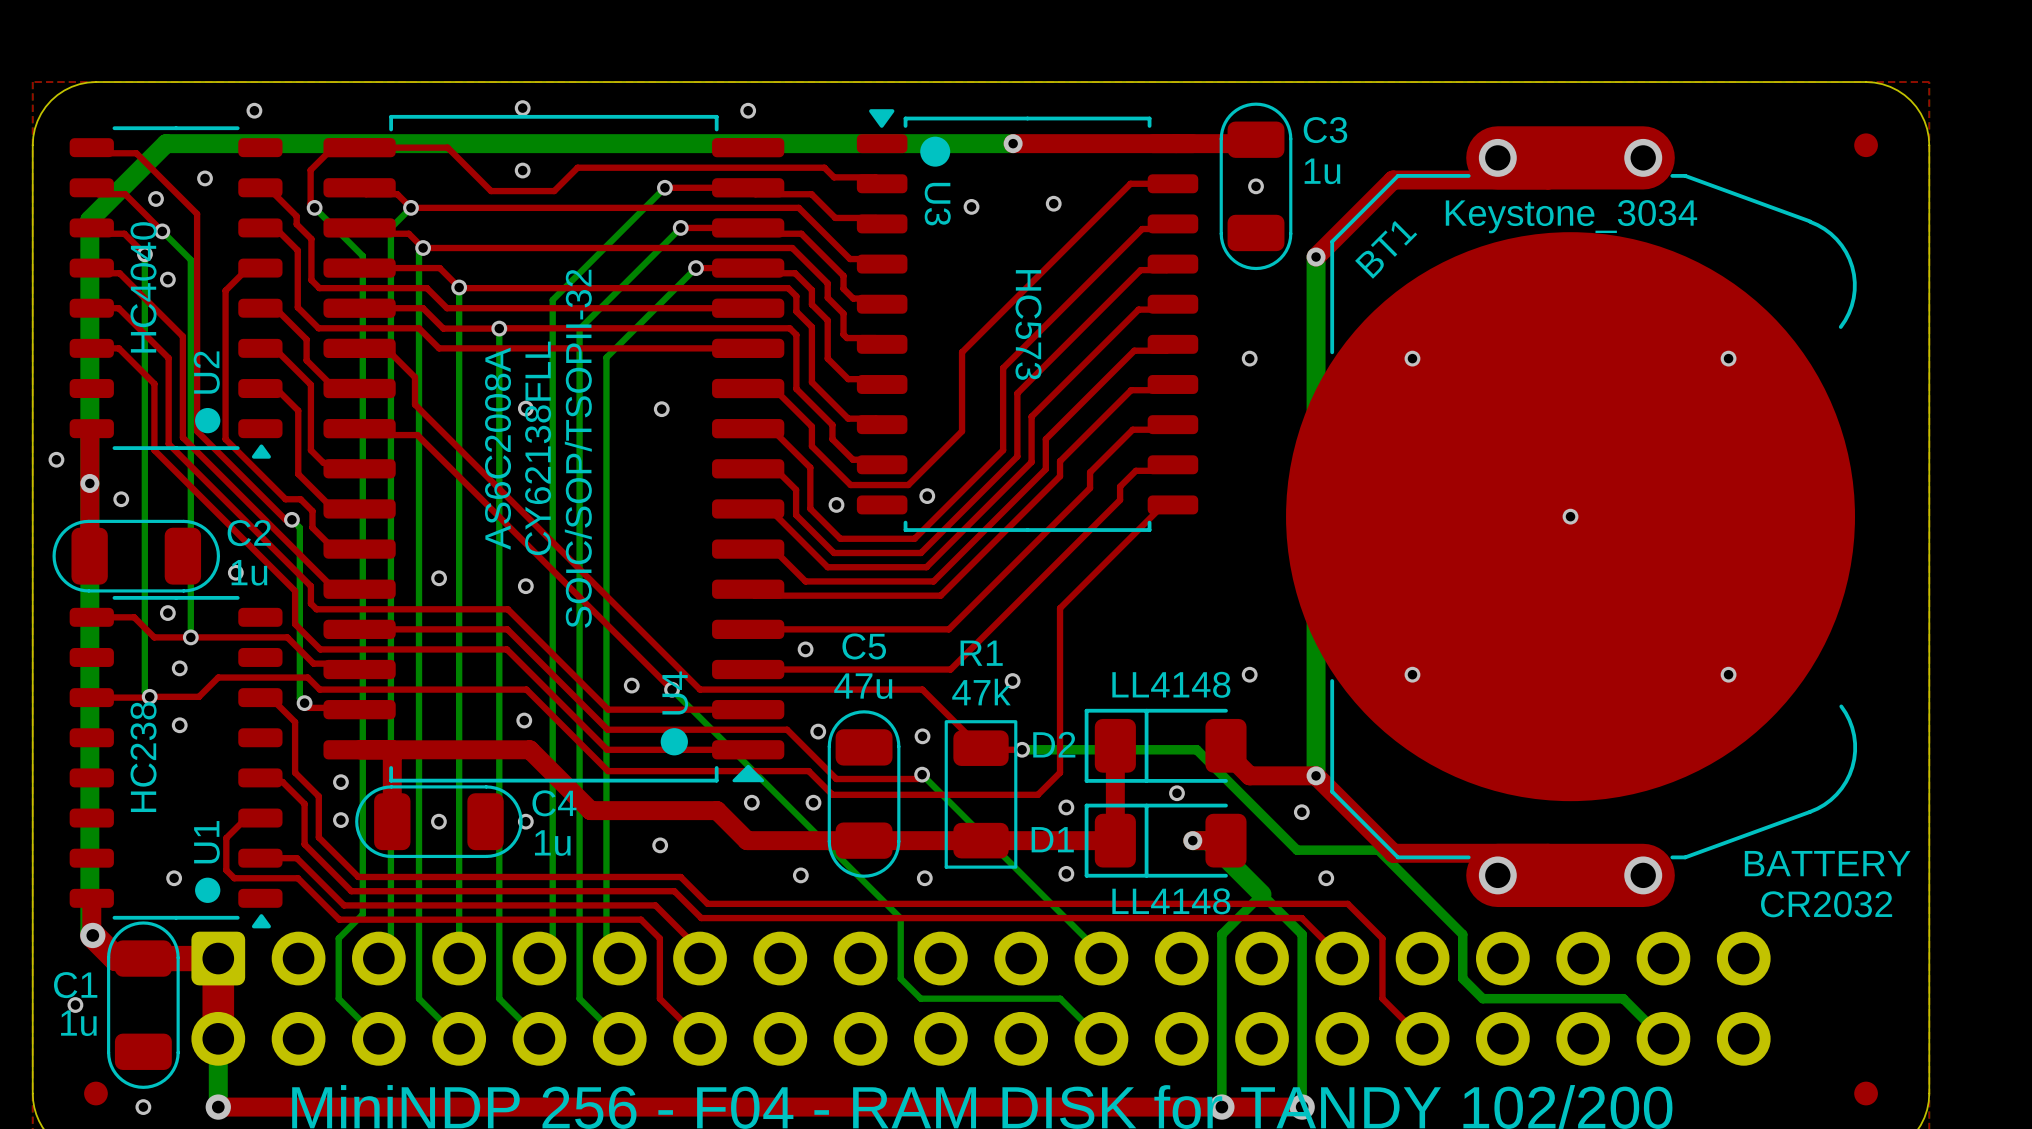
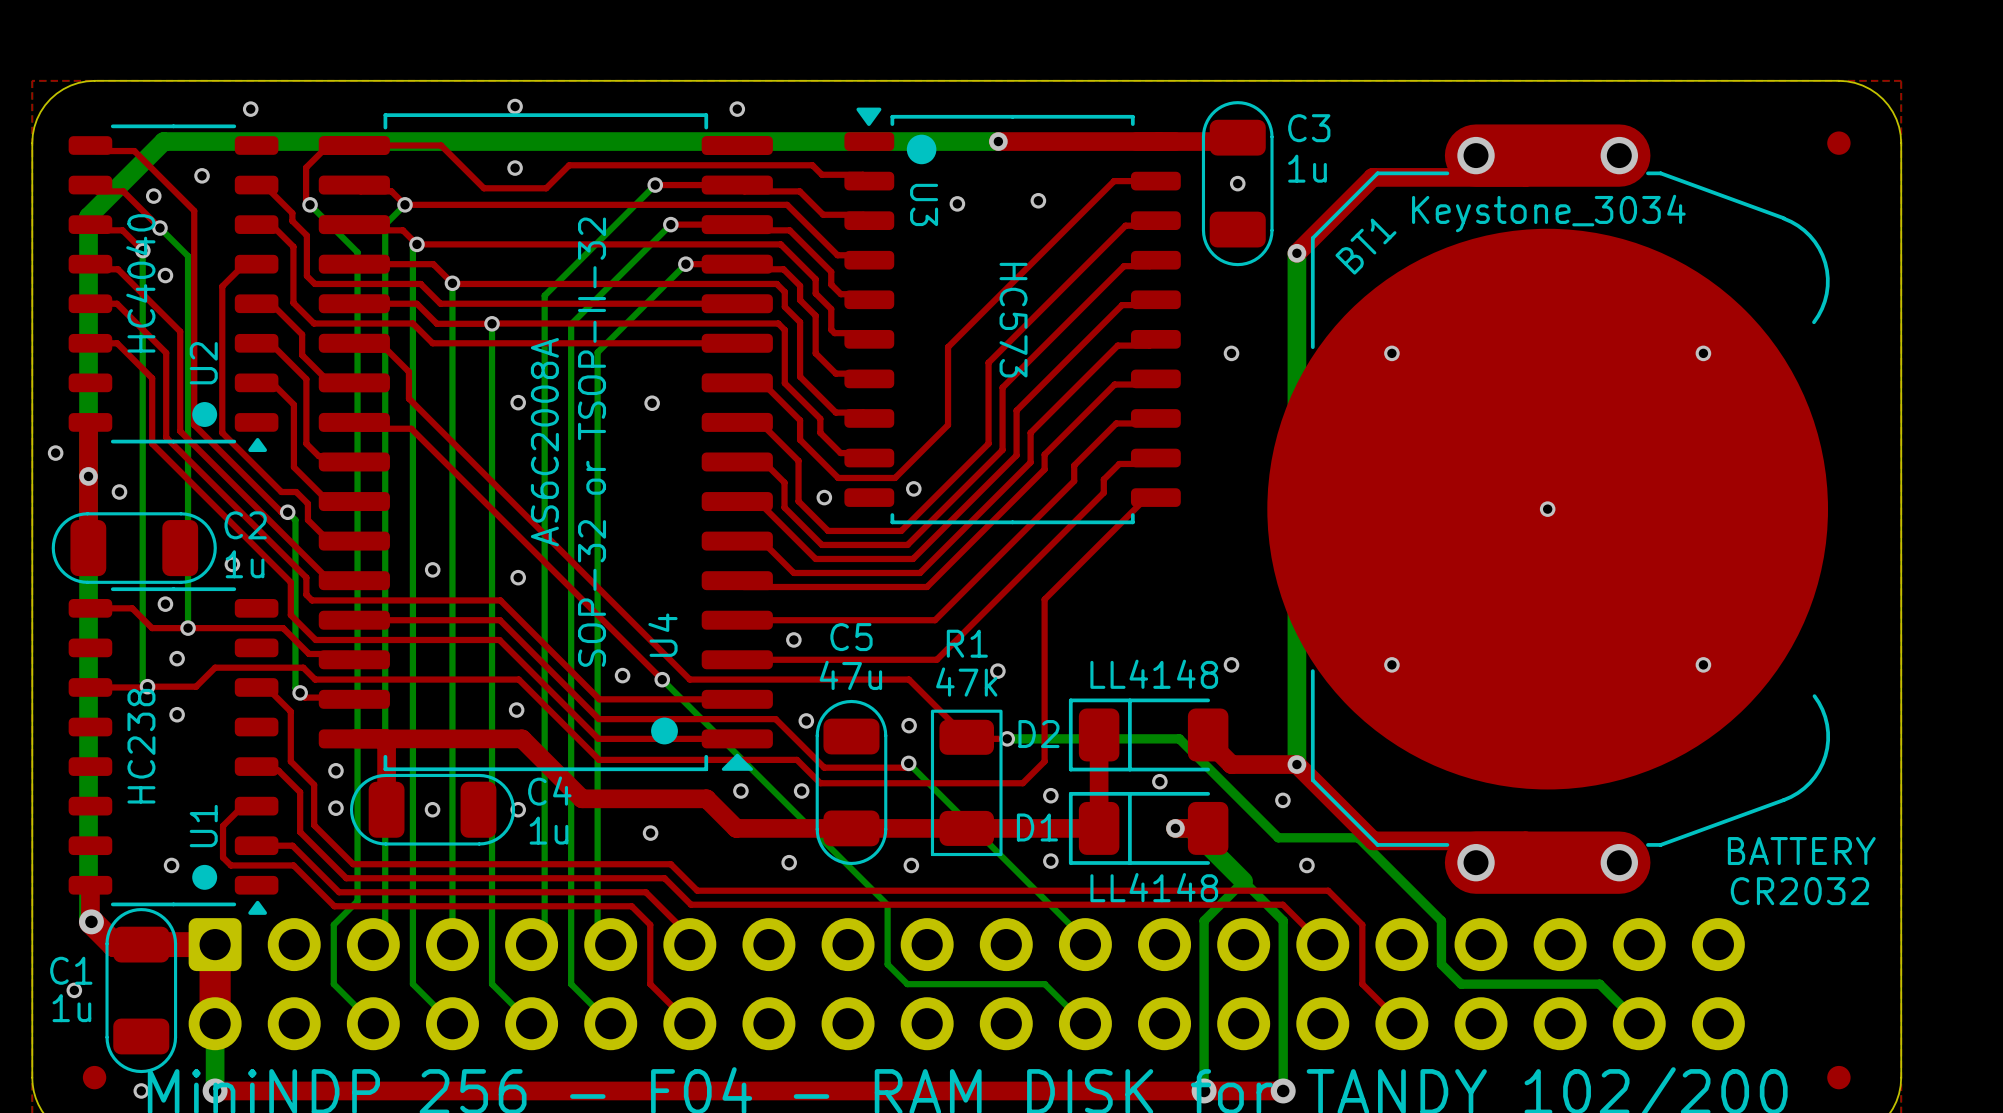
U4 value position: AS6C2008A (498, 448) -> AS6C2008A (544, 442)
text: CY62138FLL (538, 448) -> none
text: SOIC/SOP/TSOPII-32 (578, 448) -> SOP-32 or TSOP-II-32 (592, 442)
U4 name position: U4 (675, 692) -> U4 (662, 635)

